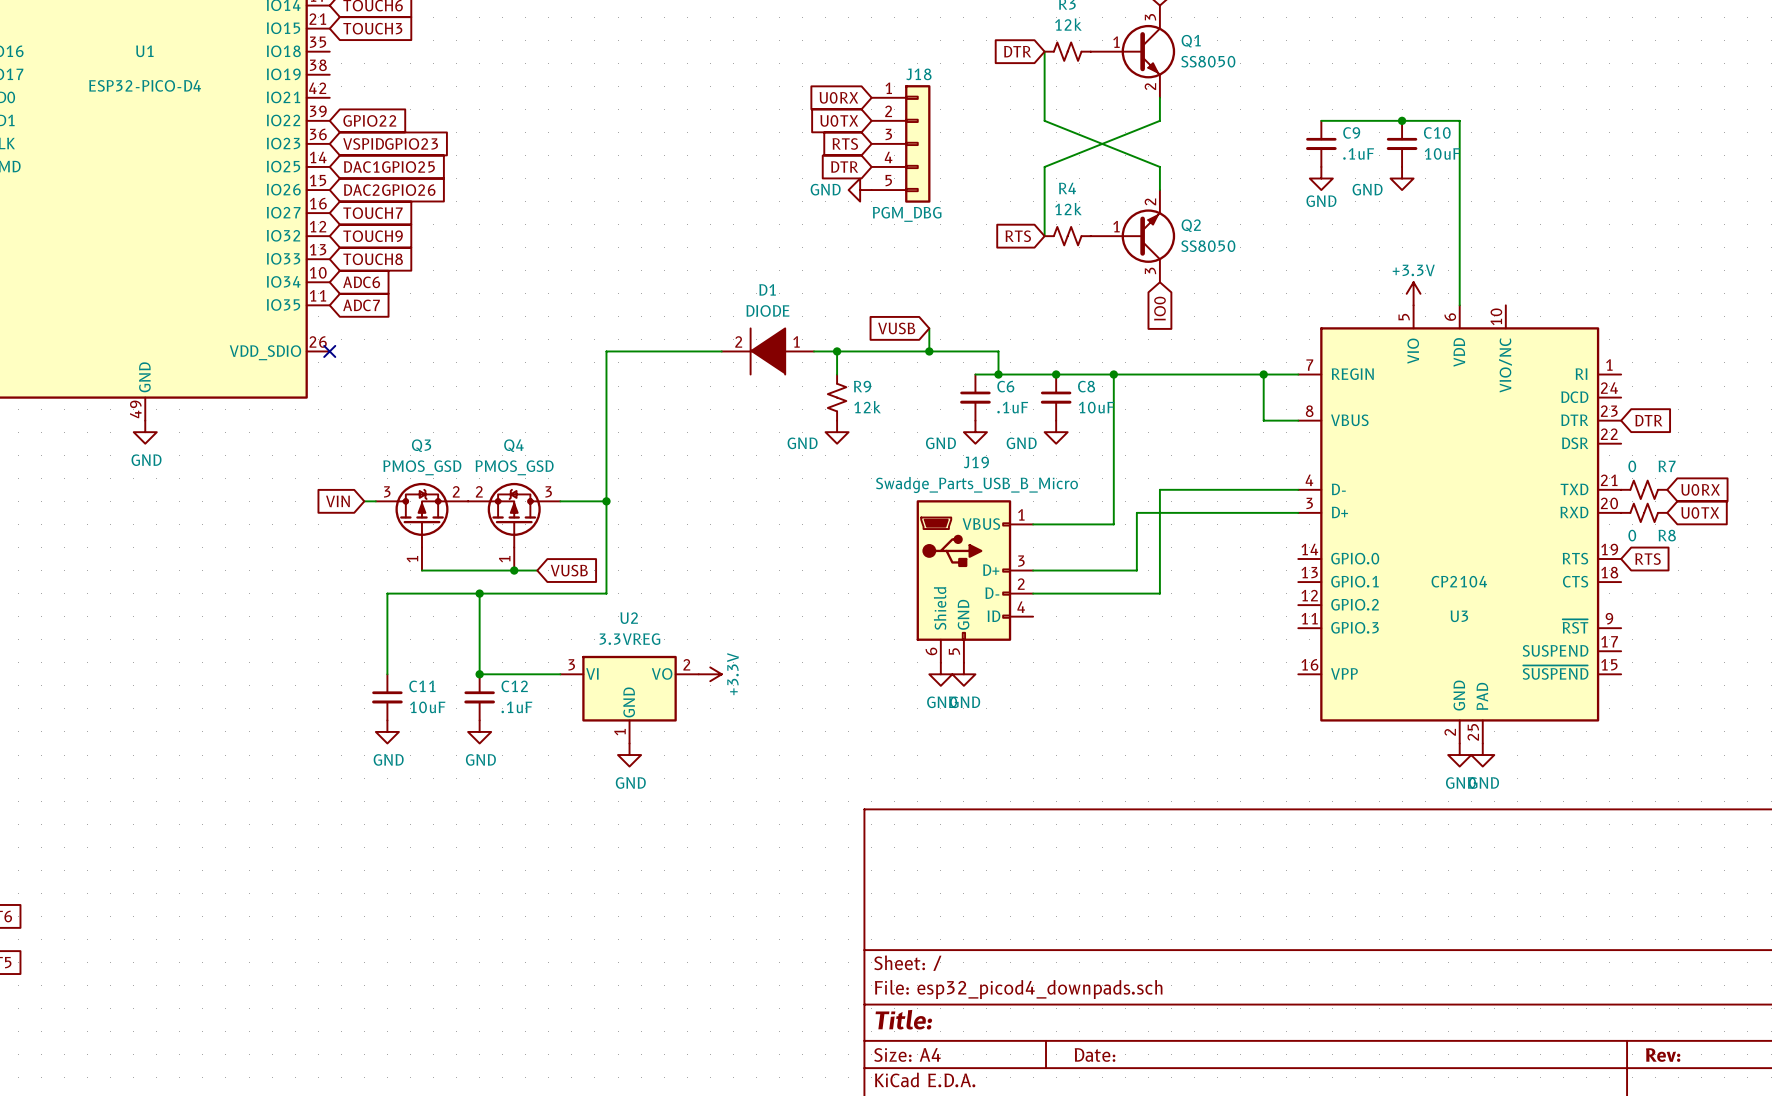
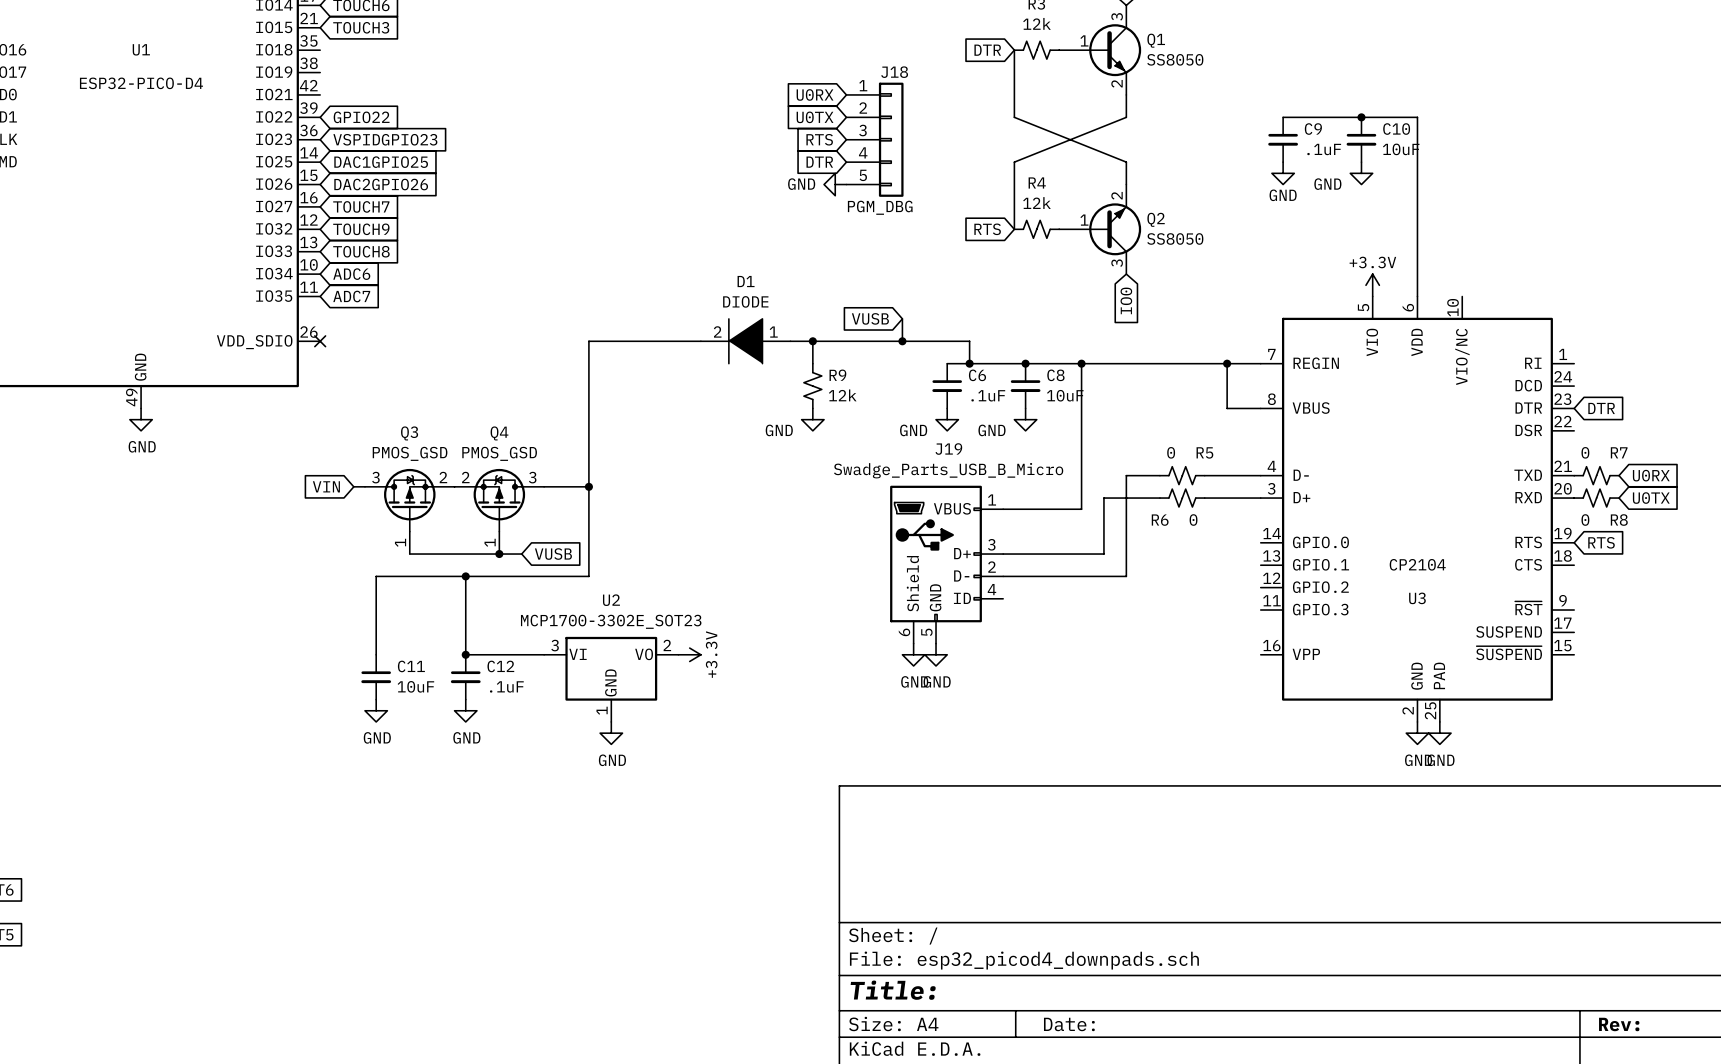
R5: none -> 0 (1182, 475)
R6: none -> 0 (1182, 498)
U2 value: 3.3VREG (629, 639) -> MCP1700-3302E_SOT23 (611, 621)

